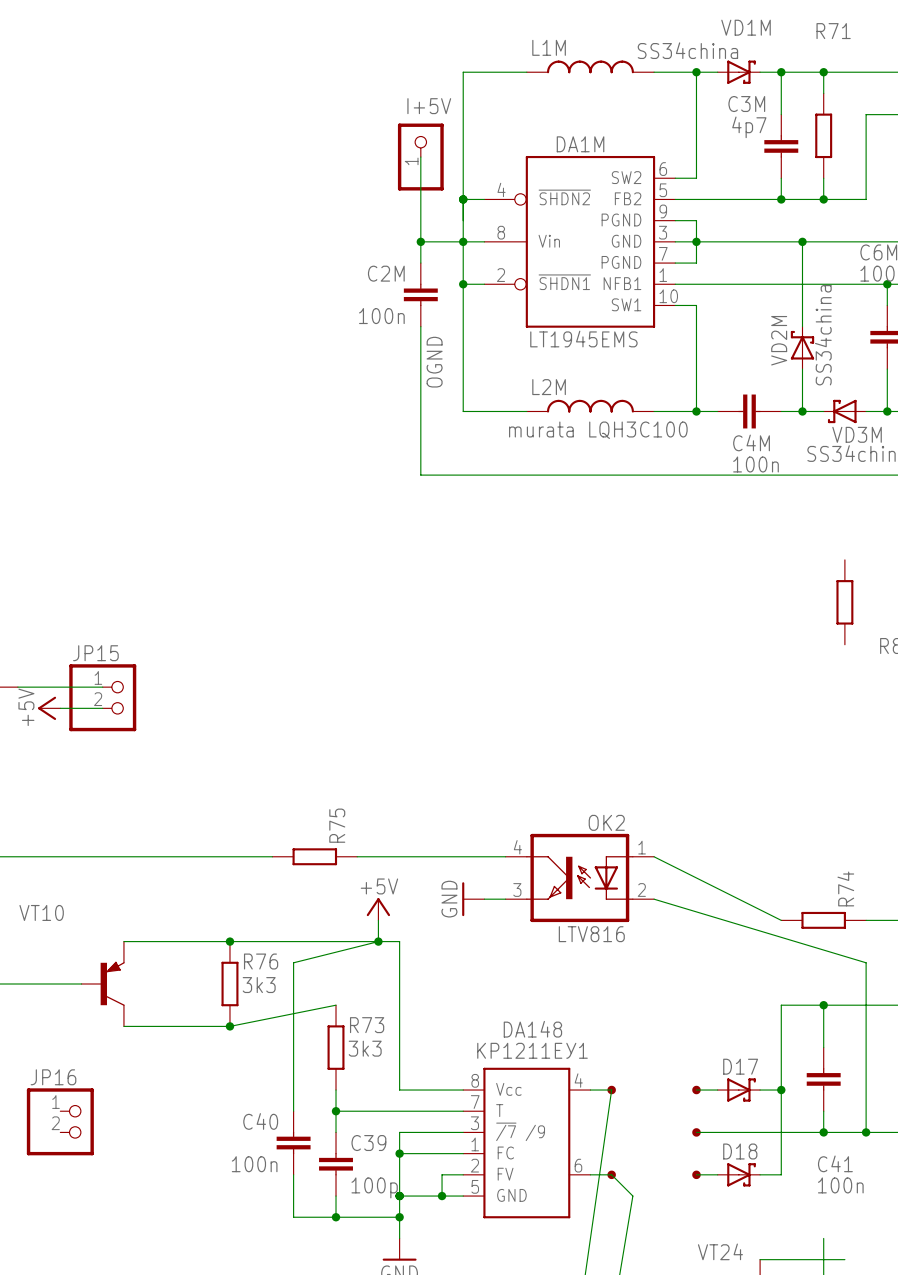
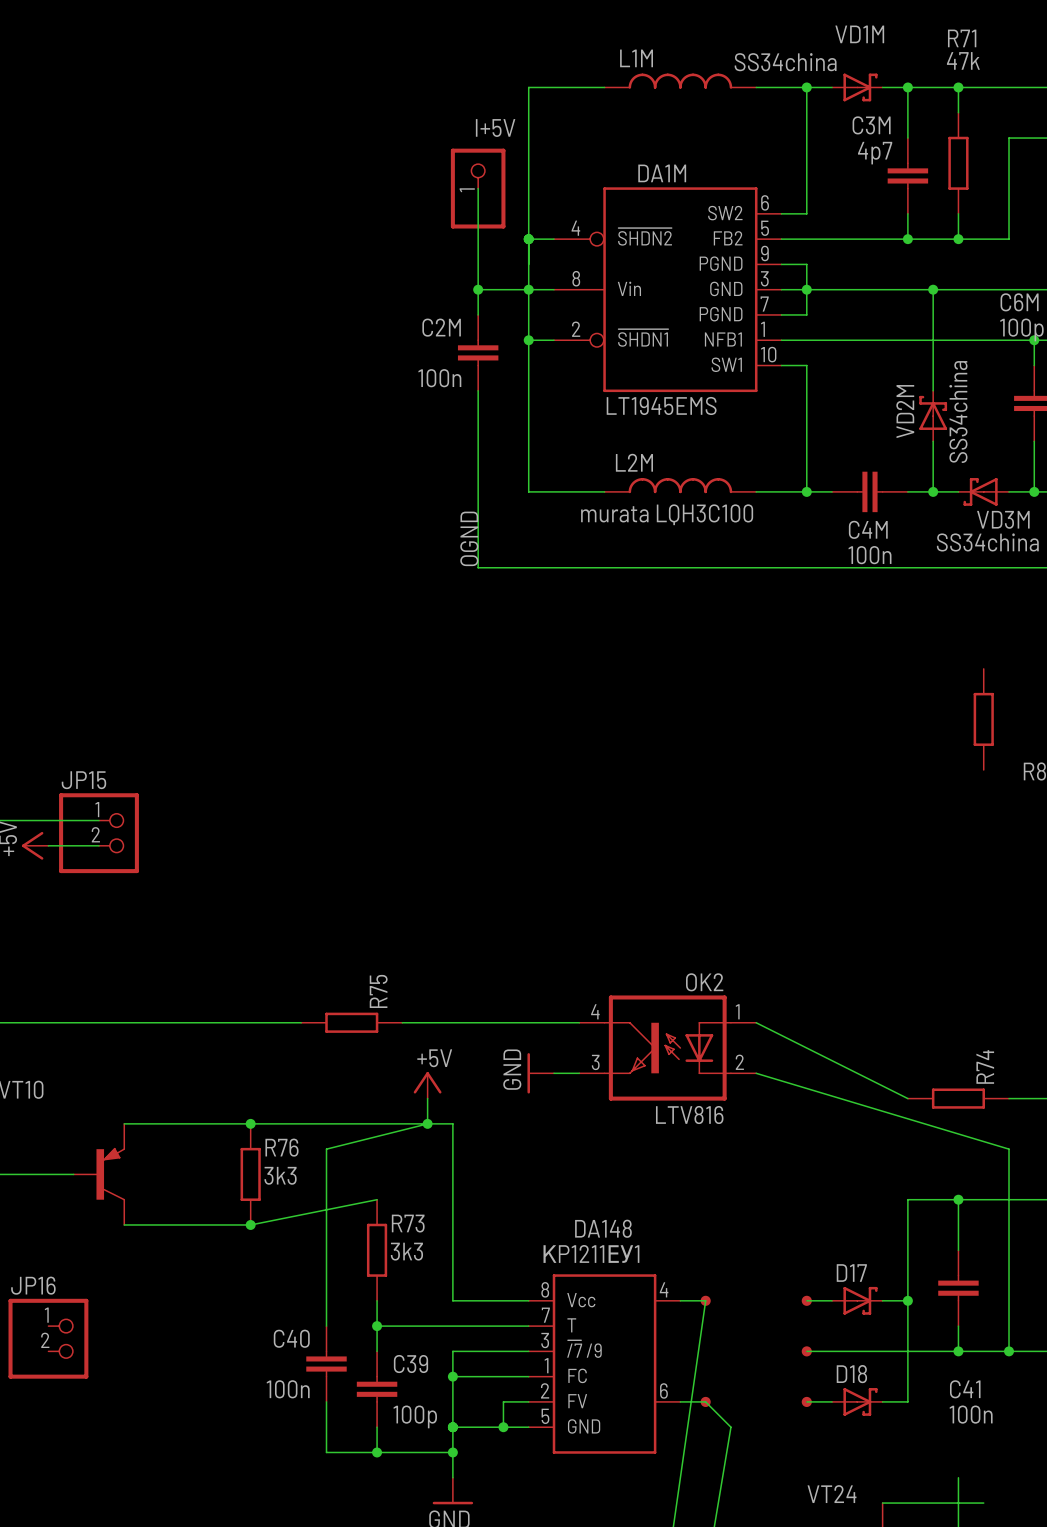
R71 value: none -> 47k (963, 60)
label position: OGND (434, 362) -> OGND (469, 538)

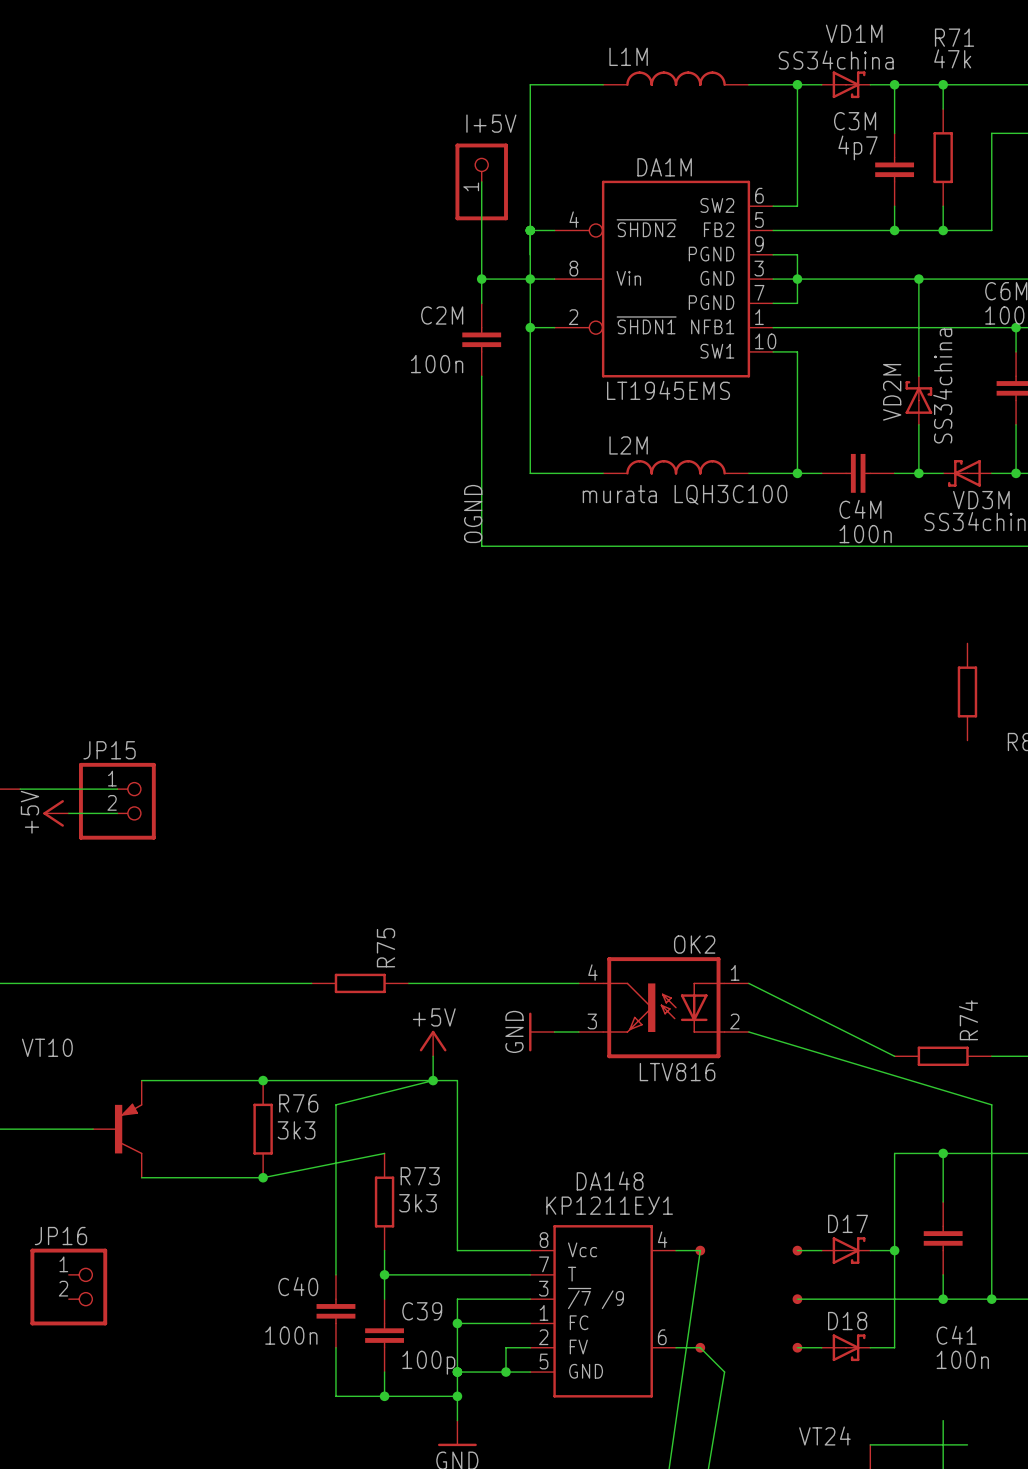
VD1M value position: SS34china (785, 62) -> SS34china (836, 60)

